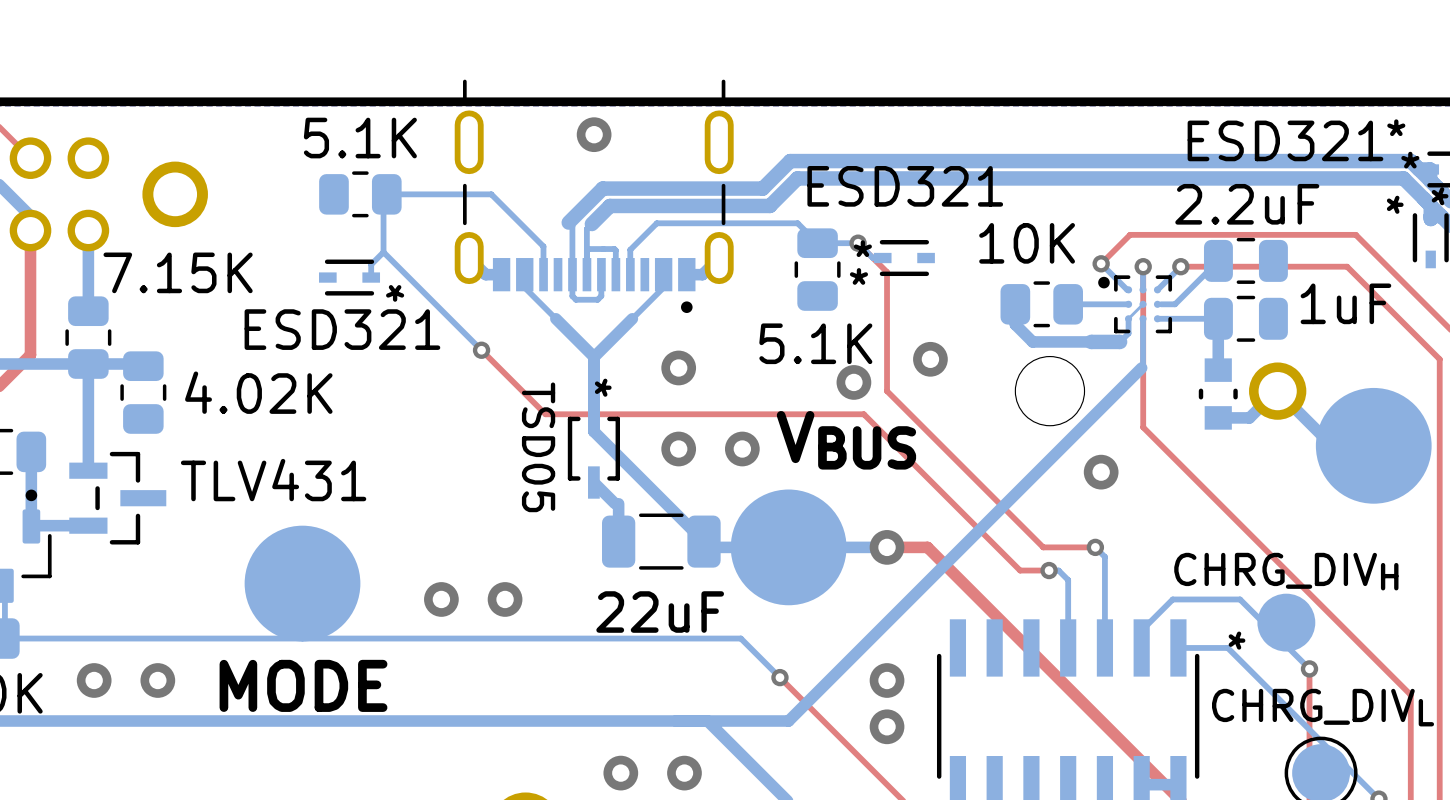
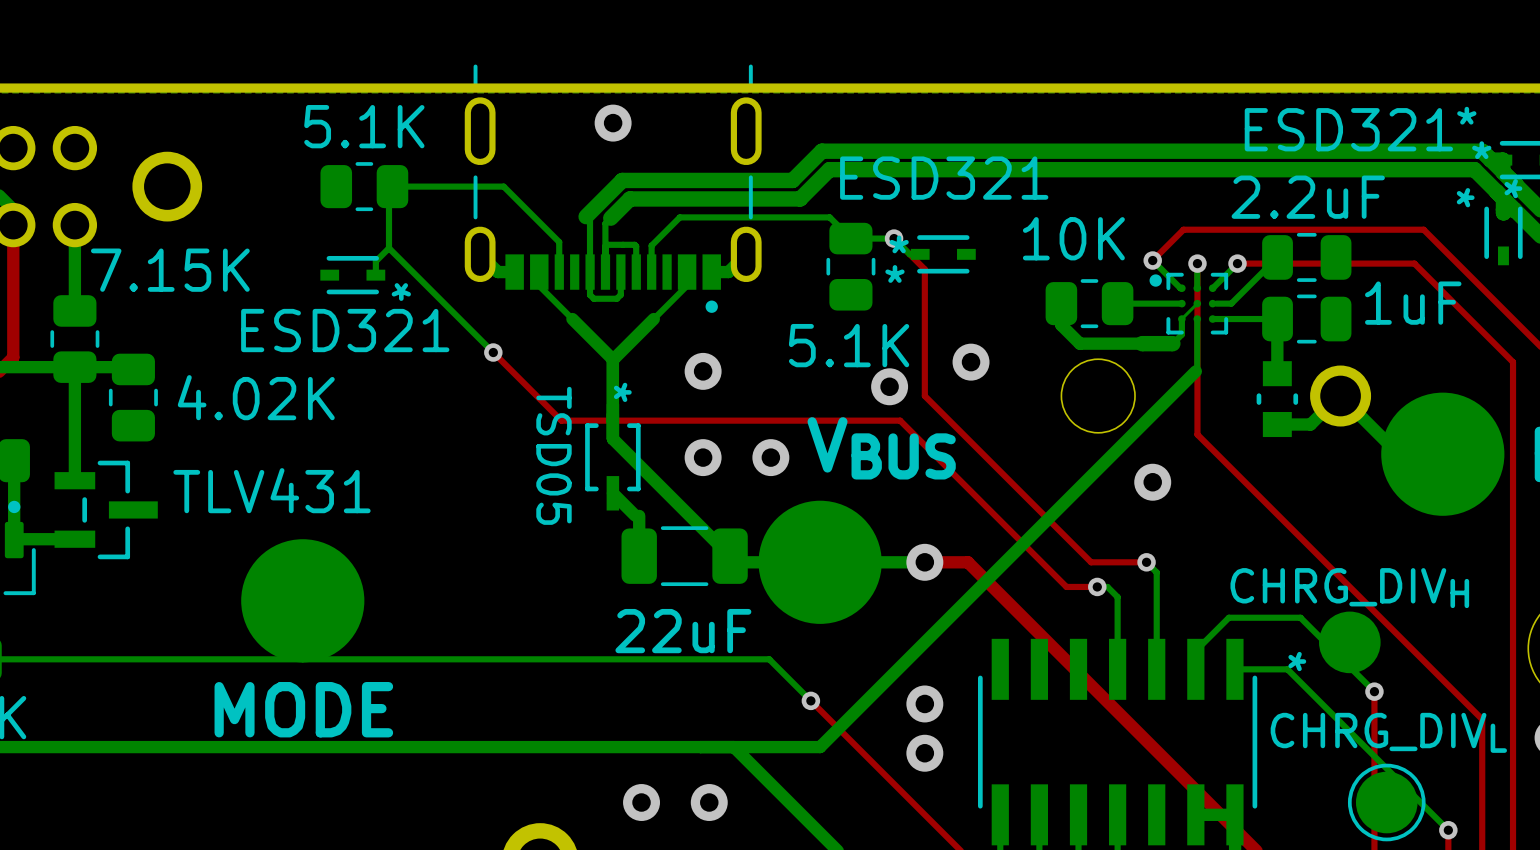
via: (441, 599) -> none
via: (505, 599) -> none
via: (94, 680) -> none
via: (157, 680) -> none

